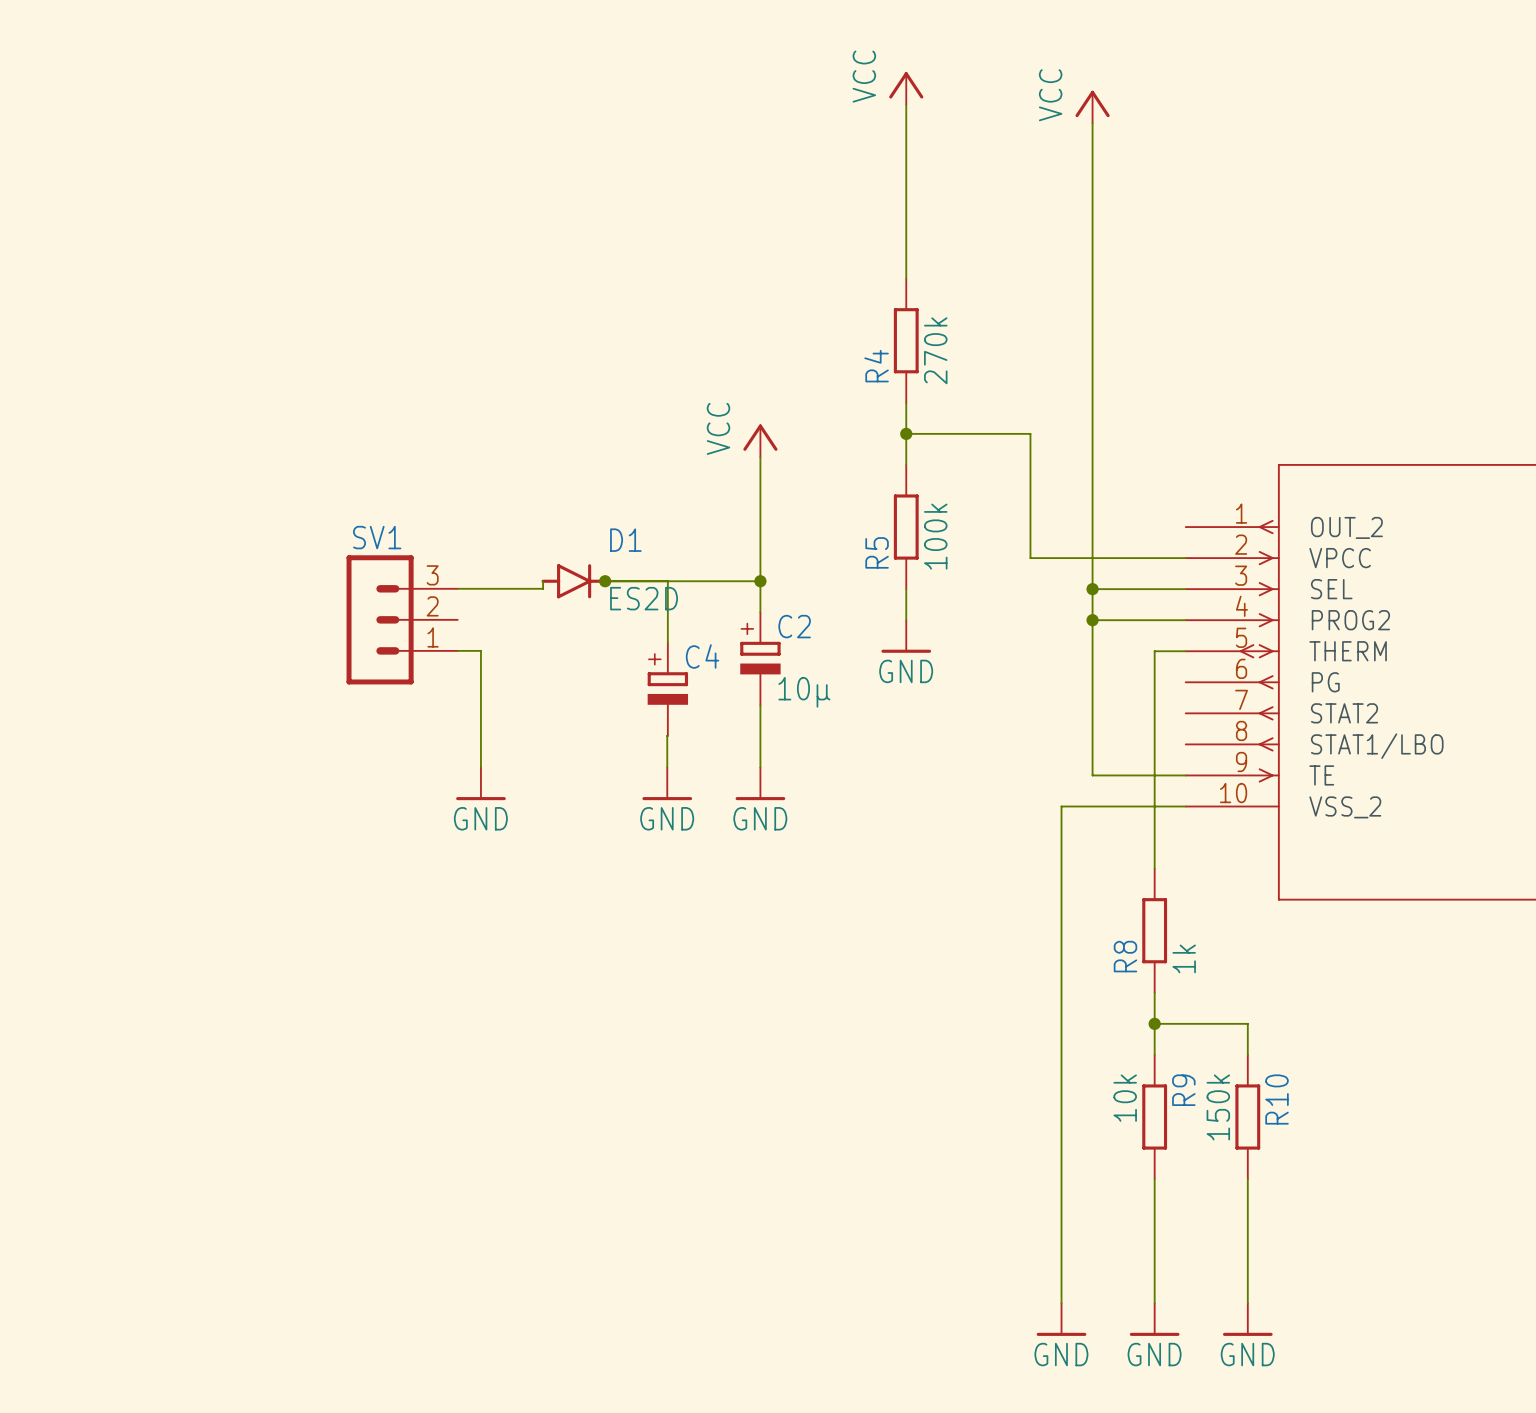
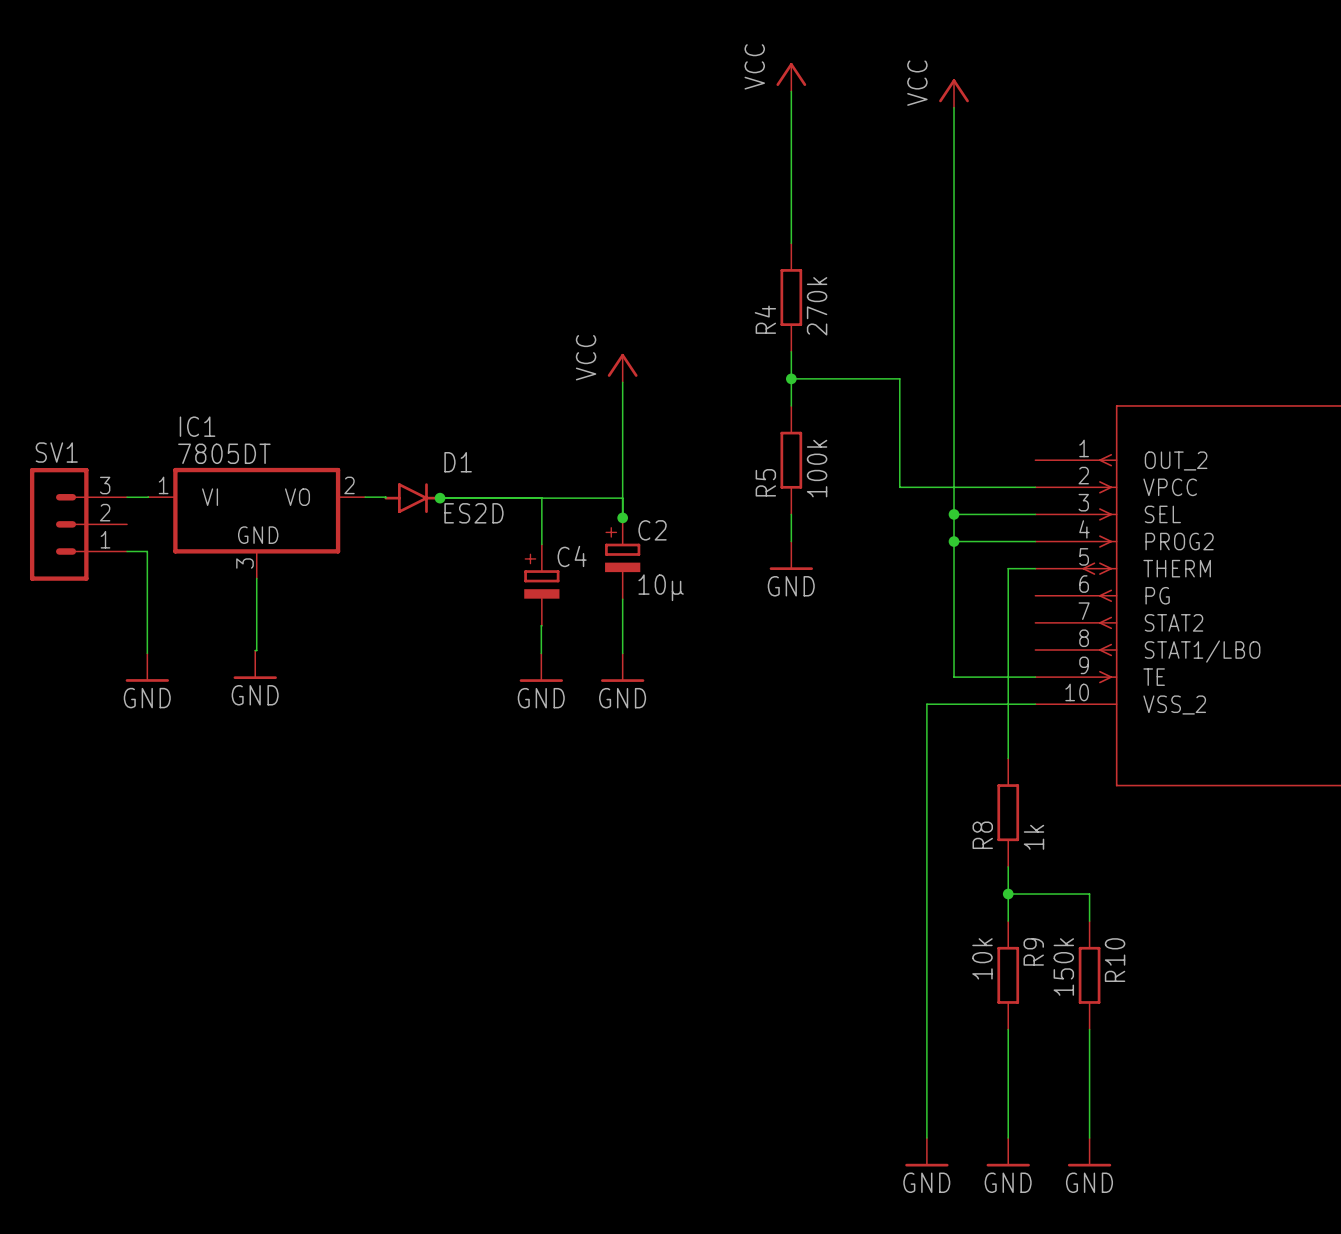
power symbol position: VCC (760, 440) -> VCC (622, 368)
wire: (760, 457) (760, 612) -> (622, 382) (622, 517)
wire: none -> (127, 497) (148, 497)
wire: none -> (365, 497) (385, 498)
wire: none -> (440, 498) (622, 498)
junction: none -> (440, 498)
wire: none -> (541, 498) (541, 544)
wire: (543, 581) (543, 588) (457, 588) -> none
D1 position: (574, 581) -> (412, 498)
wire: (605, 581) (760, 581) -> none
junction: (605, 581) -> none
wire: (667, 581) (667, 642) -> none
junction position: (760, 581) -> (622, 517)
IC1: none -> 7805DT (256, 523)
SV1 position: (402, 619) -> (78, 524)
wire: none -> (127, 551) (147, 551) (147, 653)
wire: (457, 650) (480, 650) (480, 767) -> none
C2 position: (760, 658) -> (622, 558)
wire: none -> (256, 578) (255, 650)
C4 position: (667, 689) -> (541, 585)
wire: (760, 705) (760, 767) -> (622, 599) (622, 653)
wire: (667, 735) (667, 767) -> (541, 625) (541, 653)
power symbol: none -> GND (255, 664)
power symbol: none -> GND (147, 667)
power symbol: none -> GND (541, 667)
power symbol: none -> GND (622, 667)
power symbol: GND (480, 783) -> none
power symbol: GND (667, 783) -> none
power symbol: GND (760, 783) -> none

